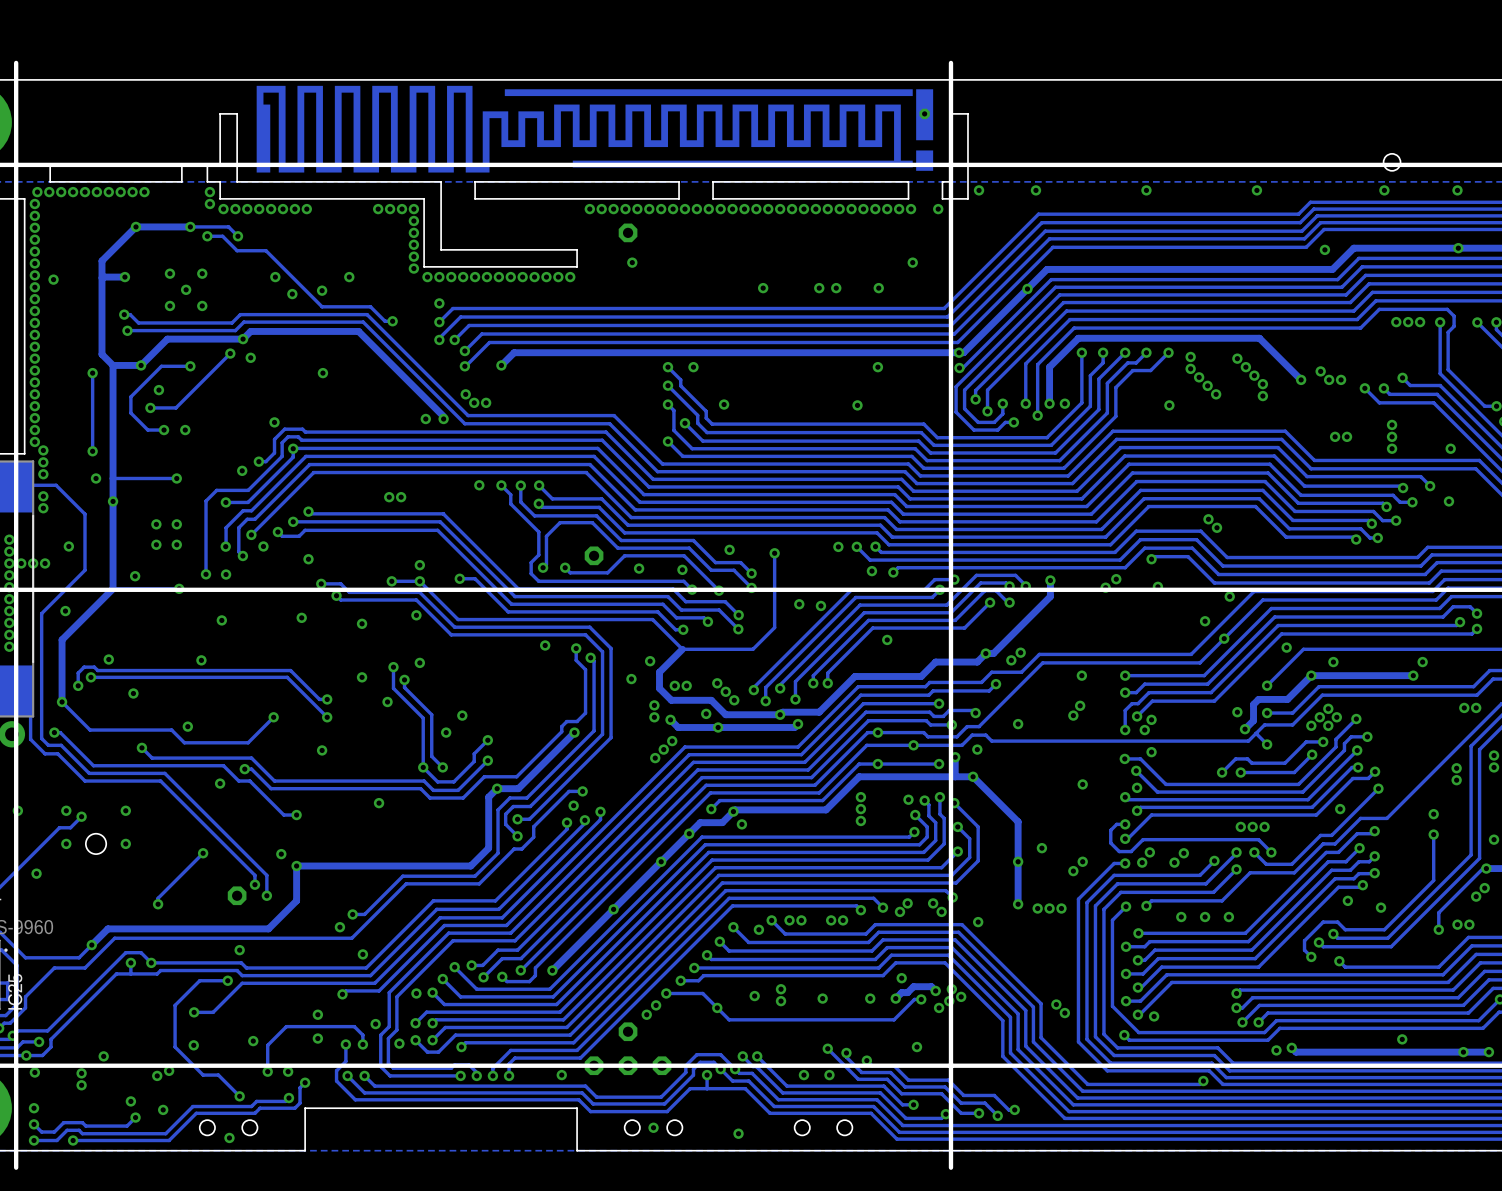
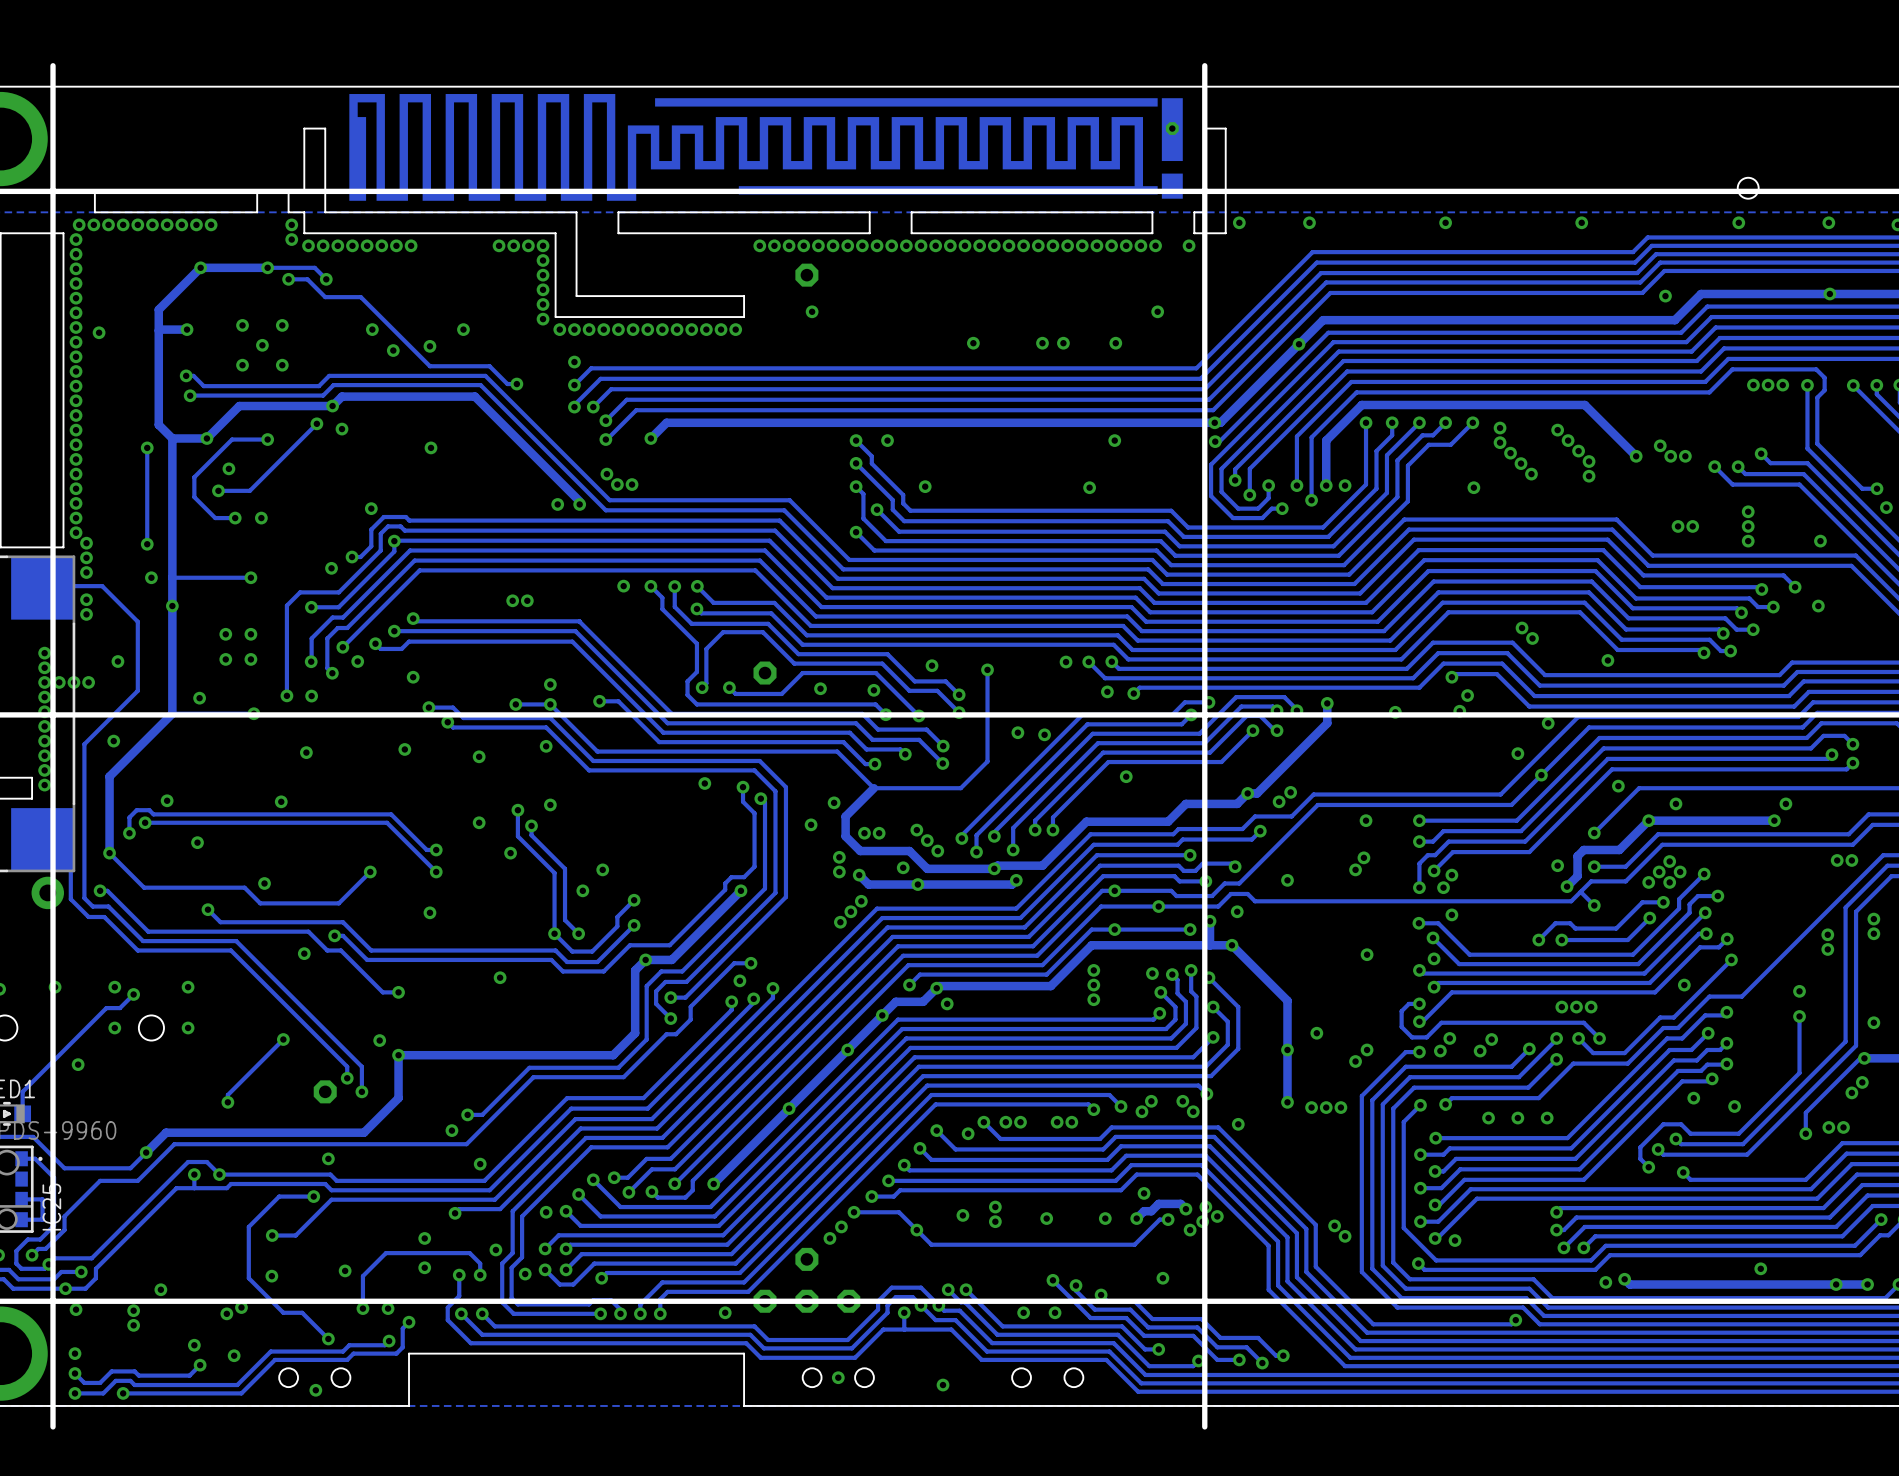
via: none -> (1607, 660)
via position: (1116, 579) -> (1467, 695)

